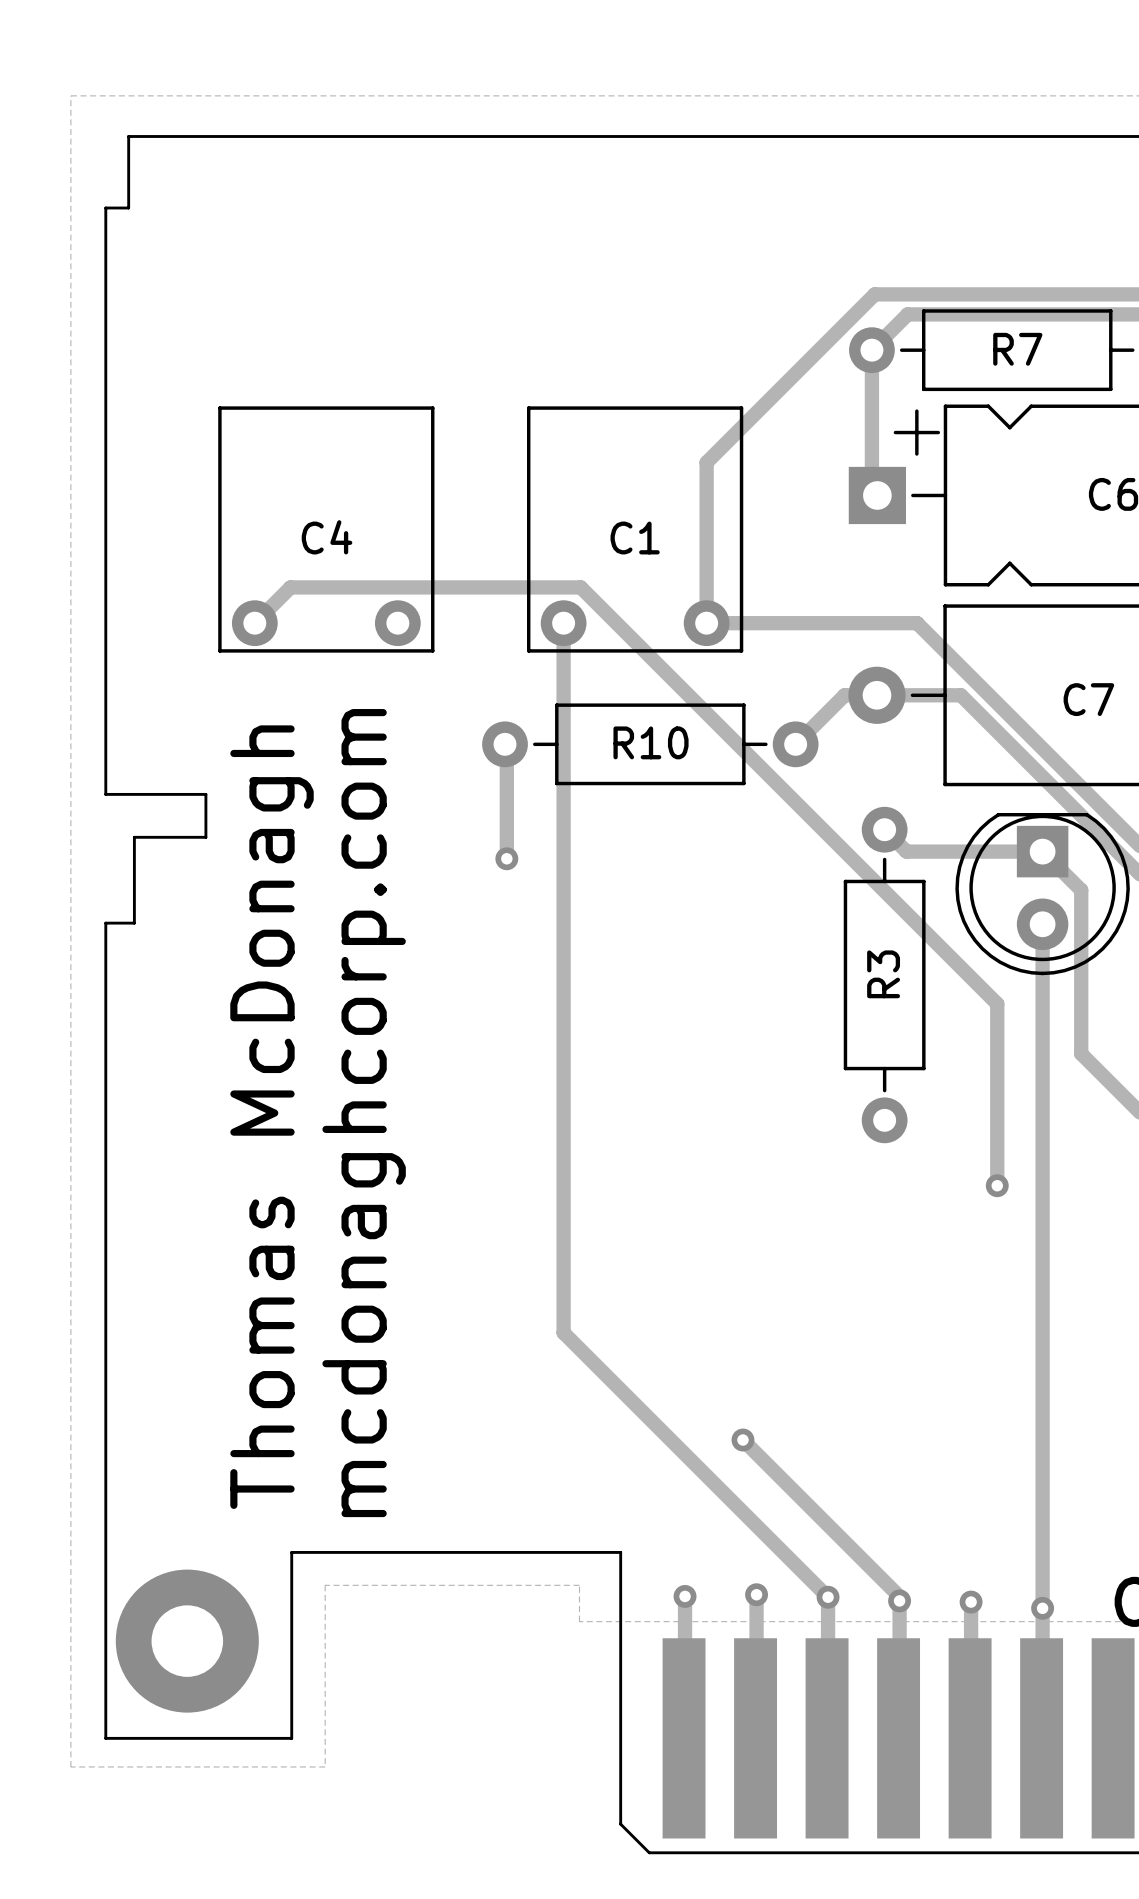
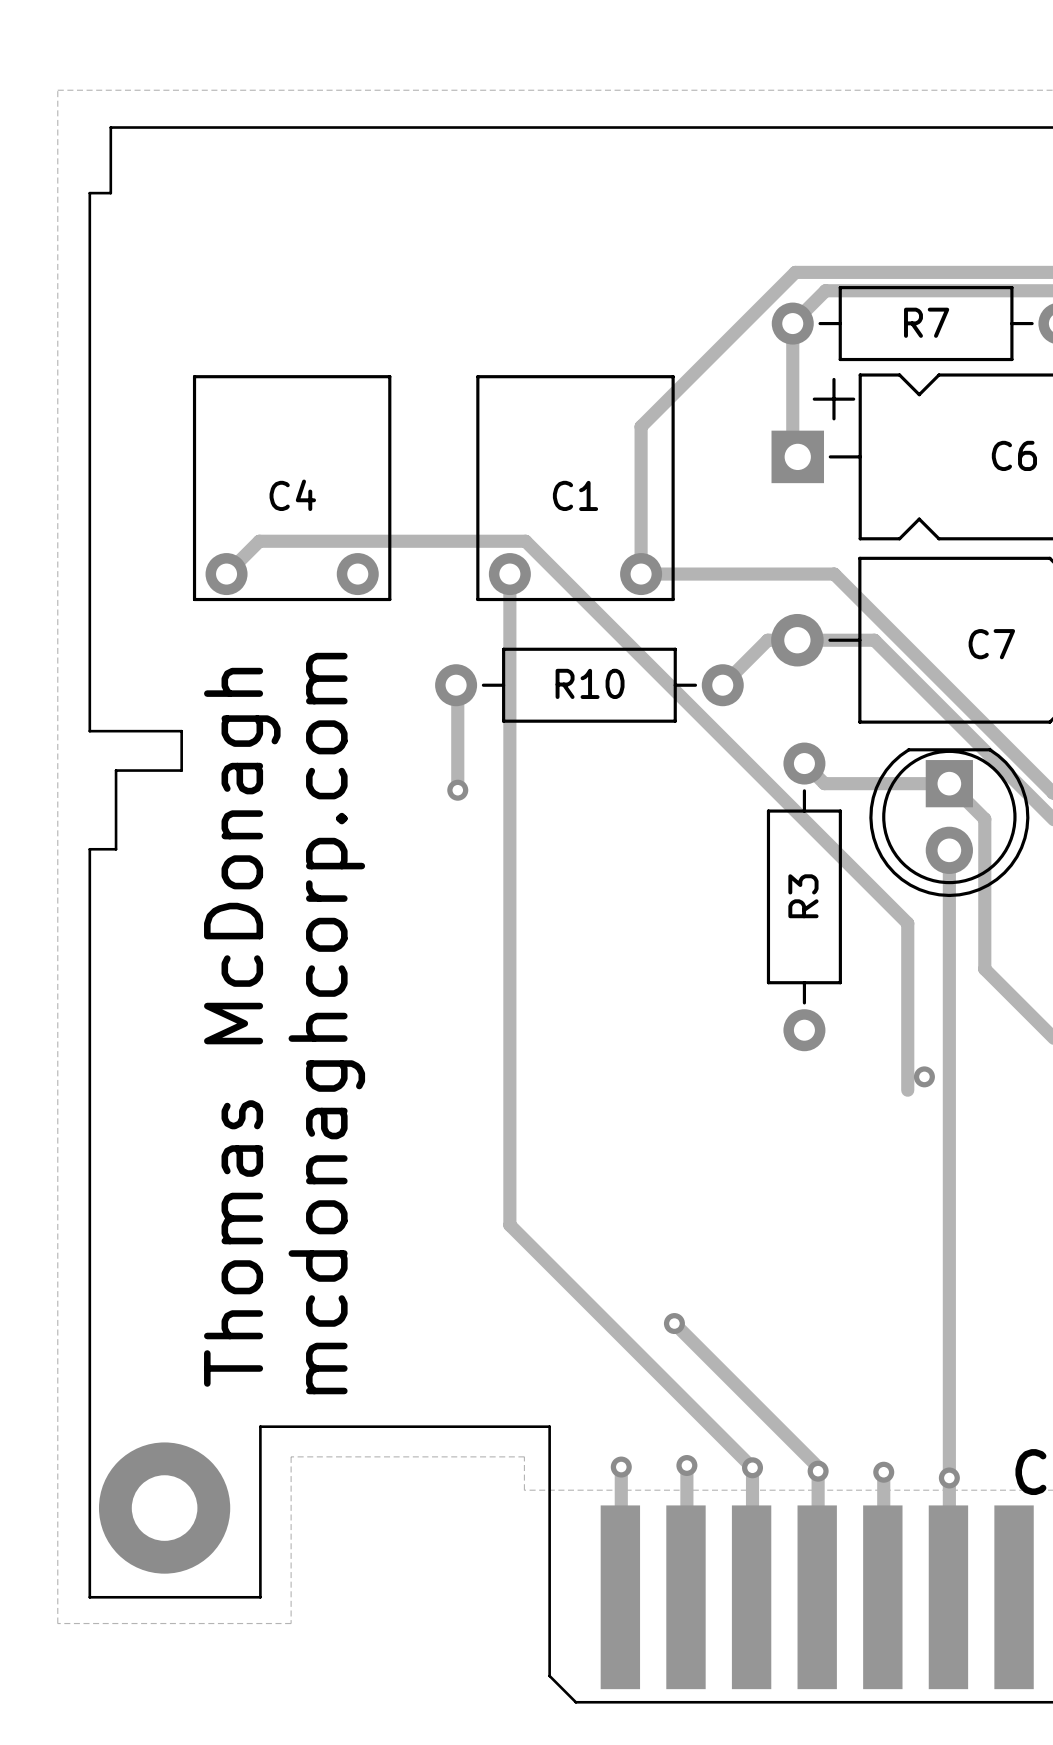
via position: (997, 1185) -> (924, 1076)
board edge: (606, 1552) (620, 1552) (620, 1824) (649, 1852) -> (549, 1426) (549, 1676) (575, 1702) (588, 1702)

